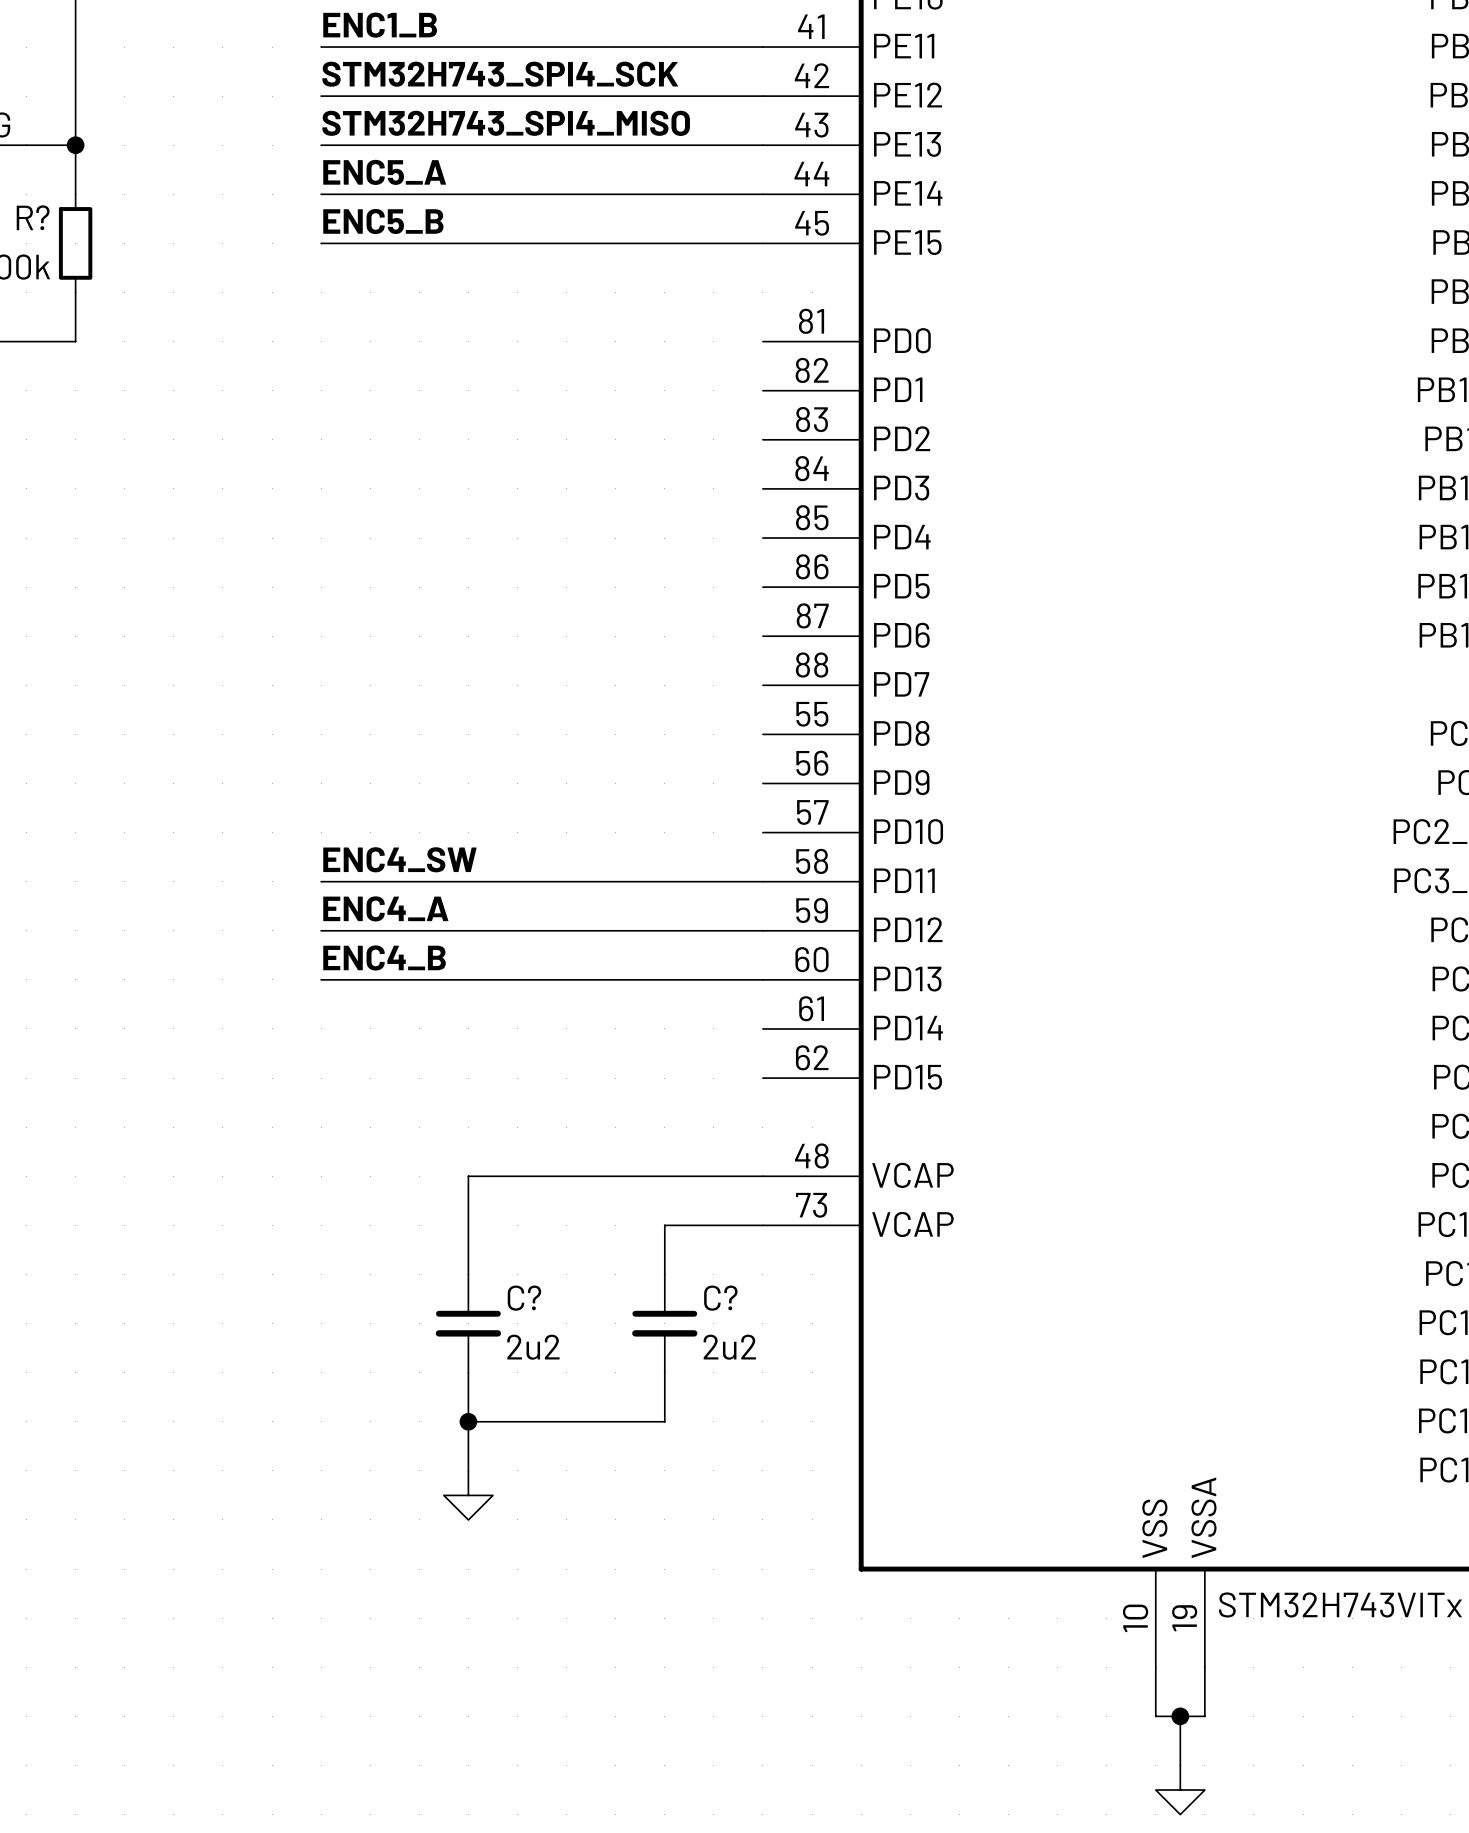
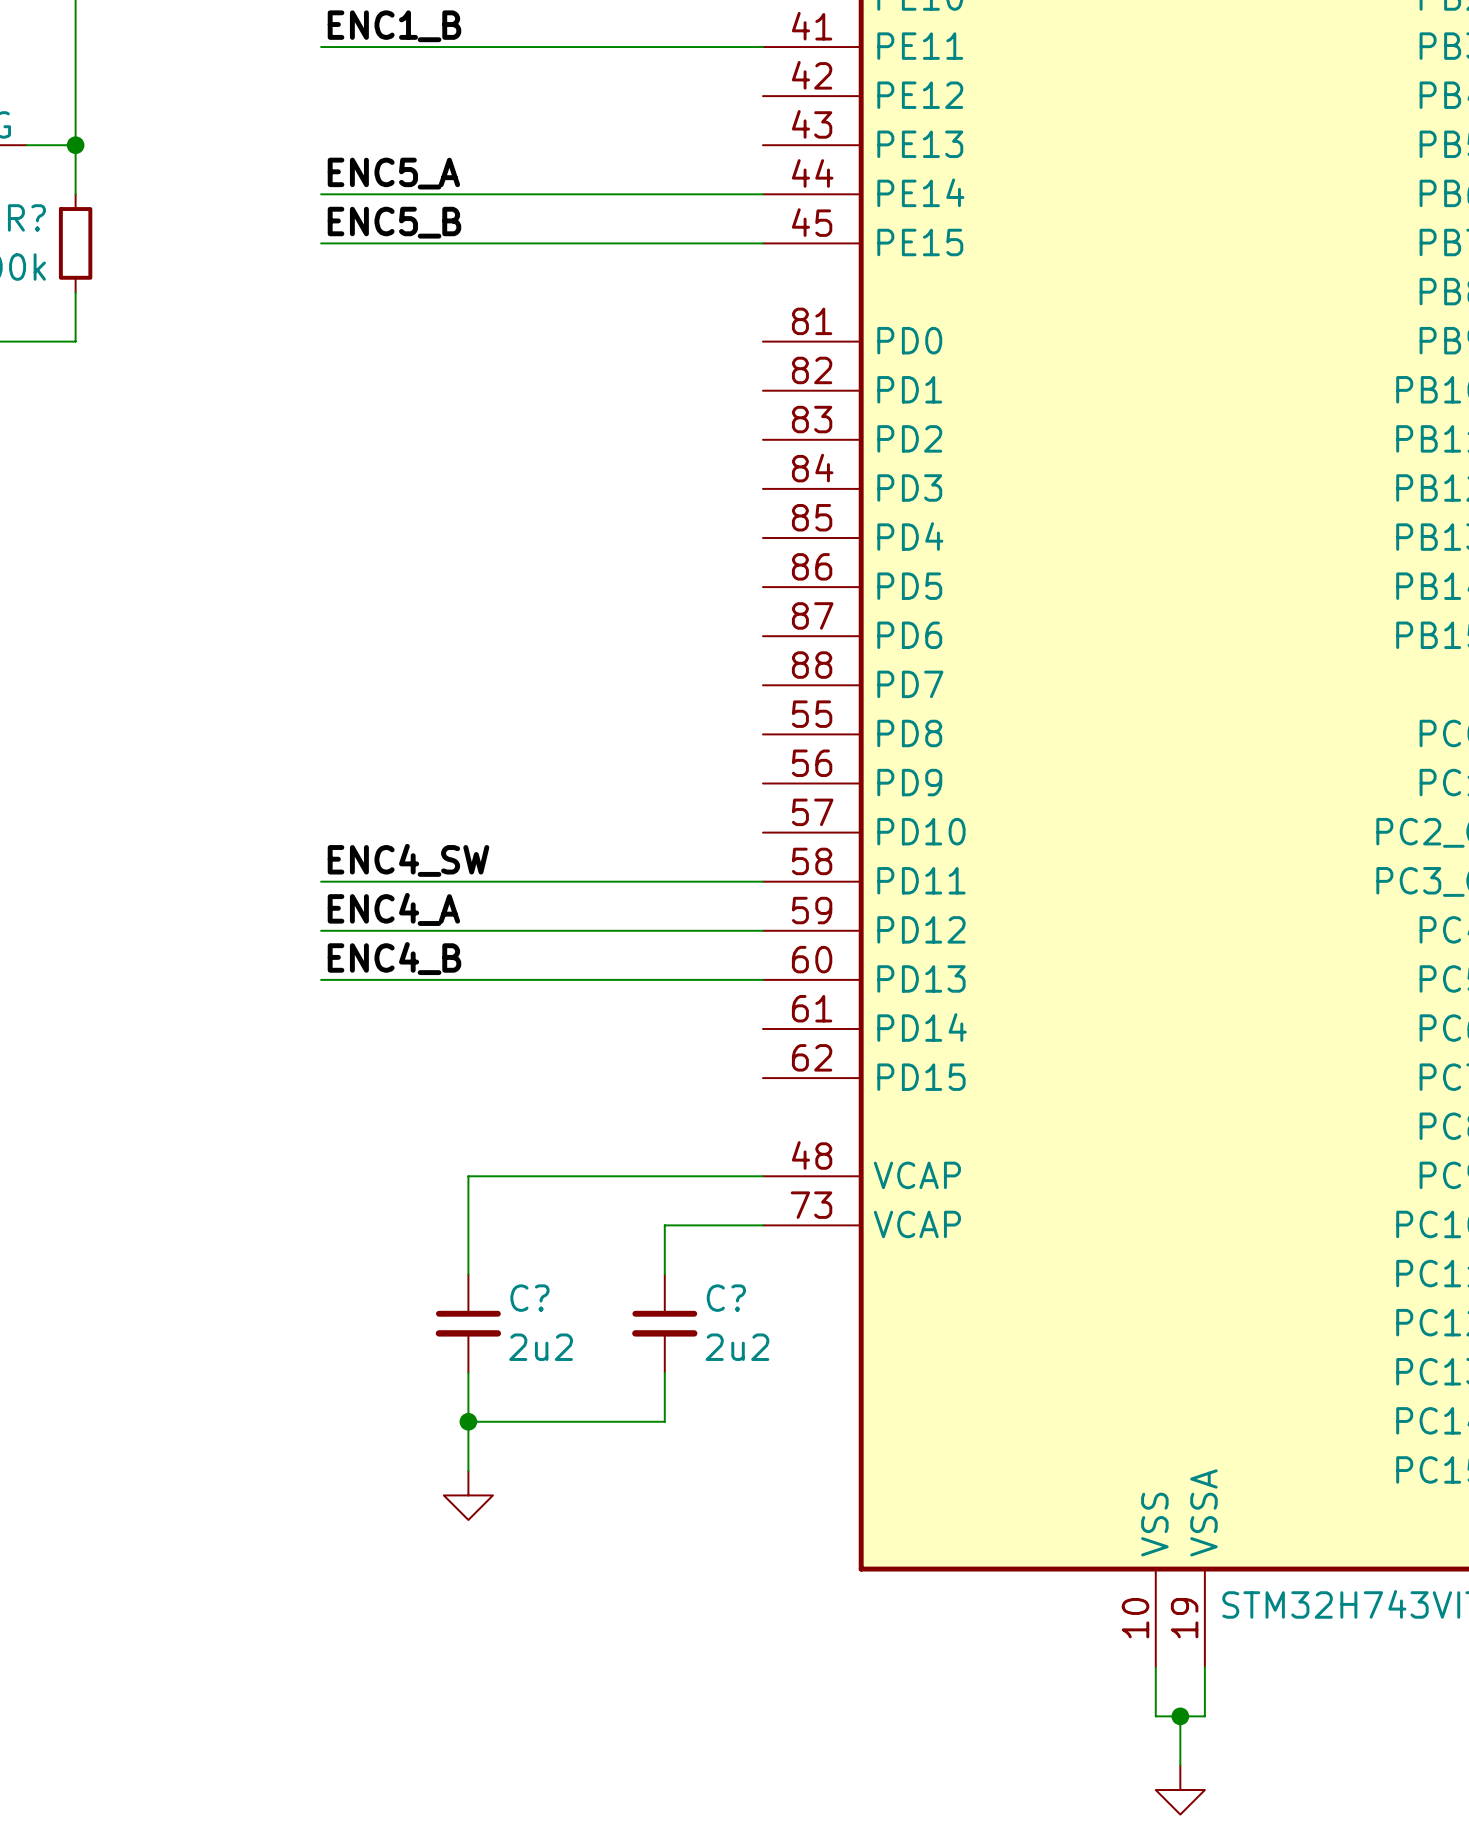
label: STM32H743_SPI4_SCK (500, 74) -> none
wire: (321, 96) (762, 96) -> none
label: STM32H743_SPI4_MISO (506, 123) -> none
wire: (321, 145) (762, 145) -> none

